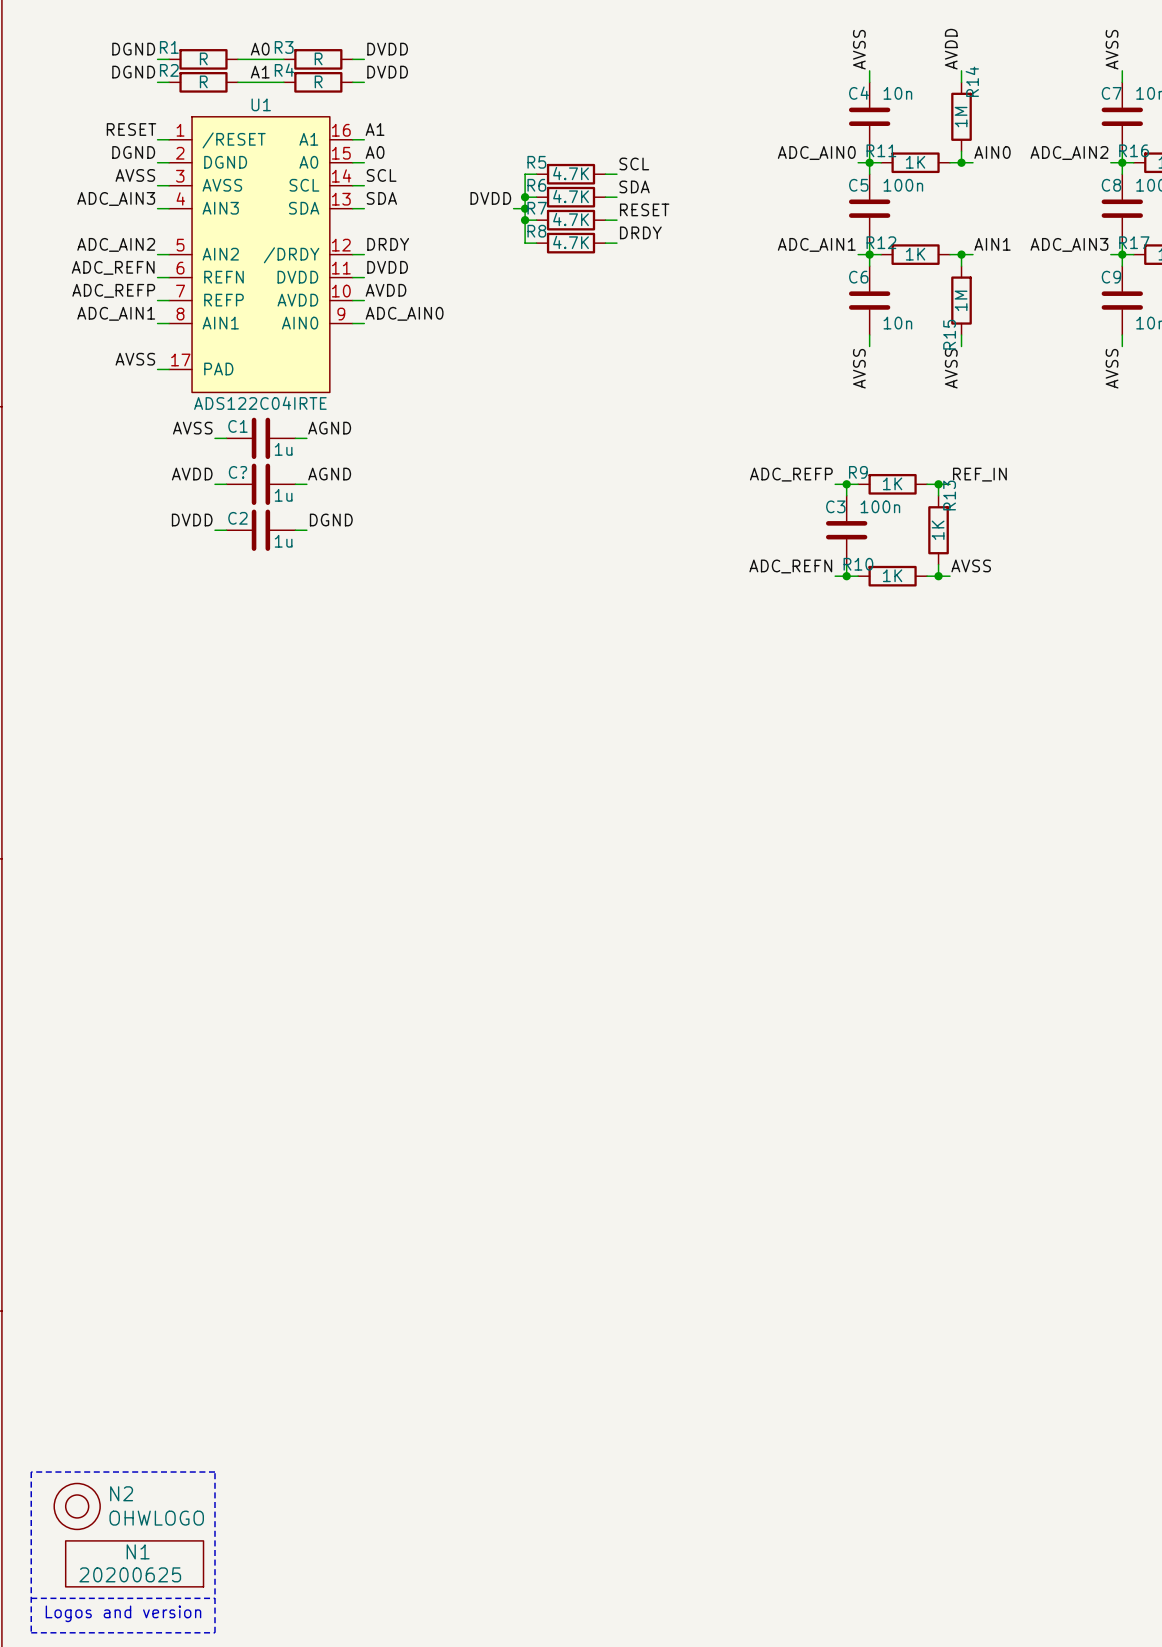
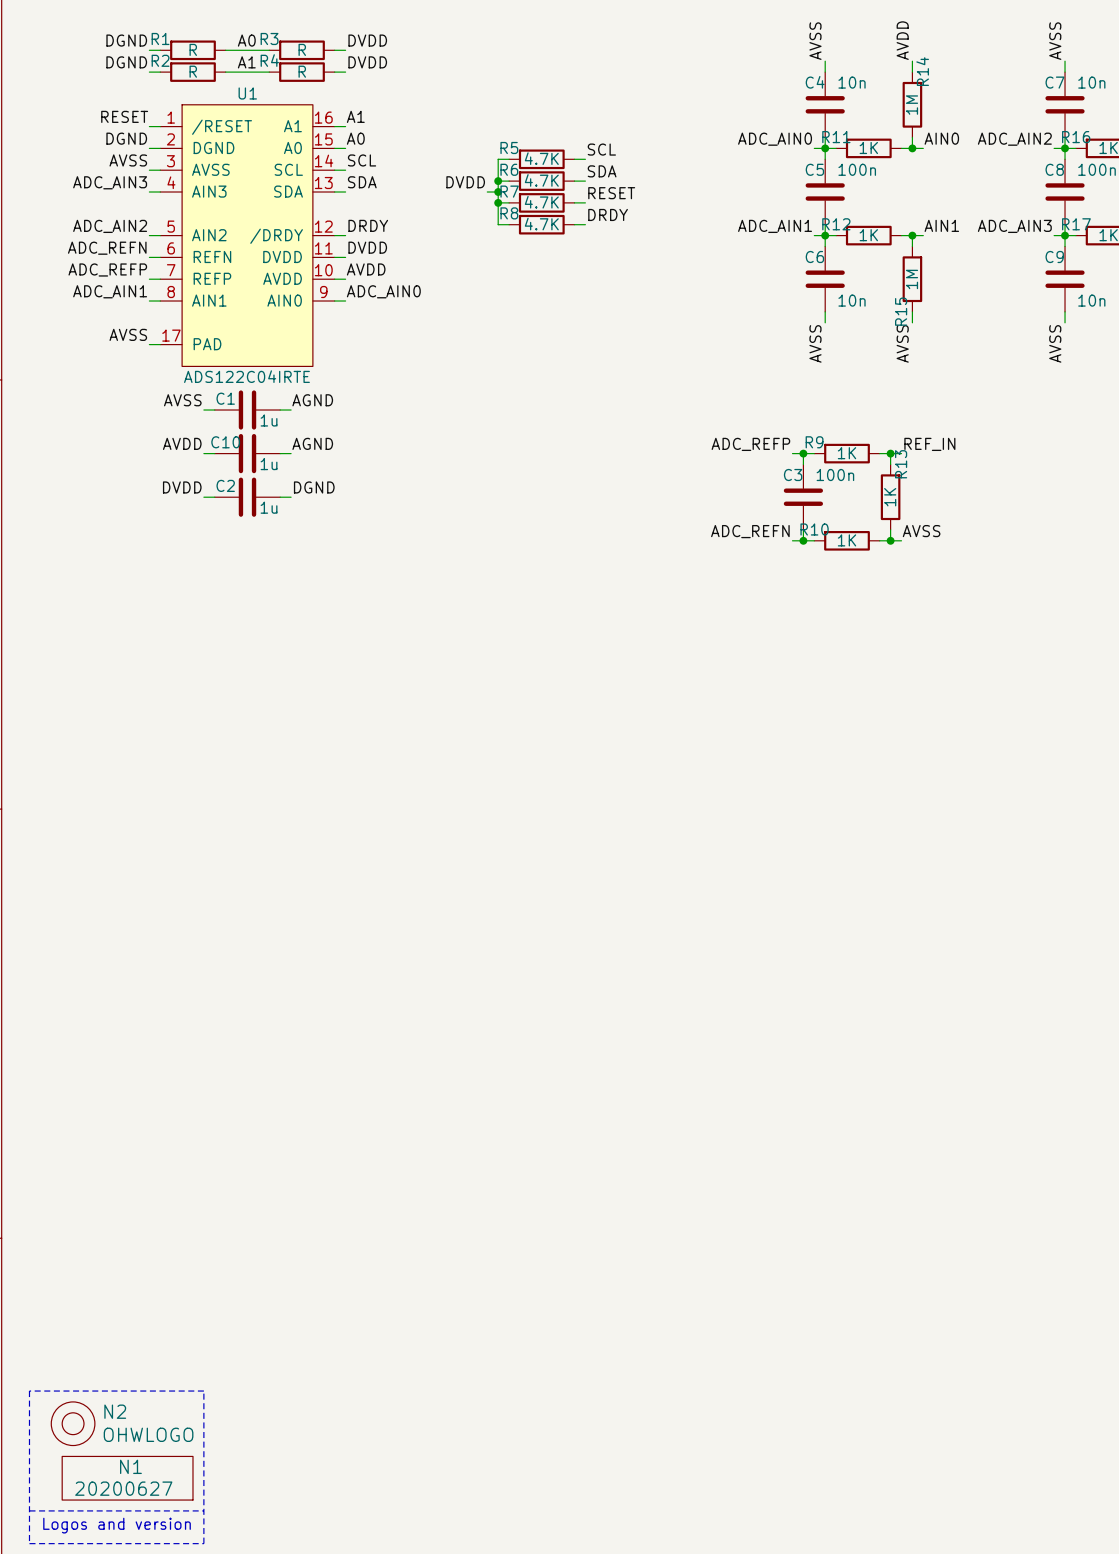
C? name: C? (237, 472) -> C10 (225, 442)
N1 value: 20200625 (130, 1574) -> 20200627 (123, 1488)

